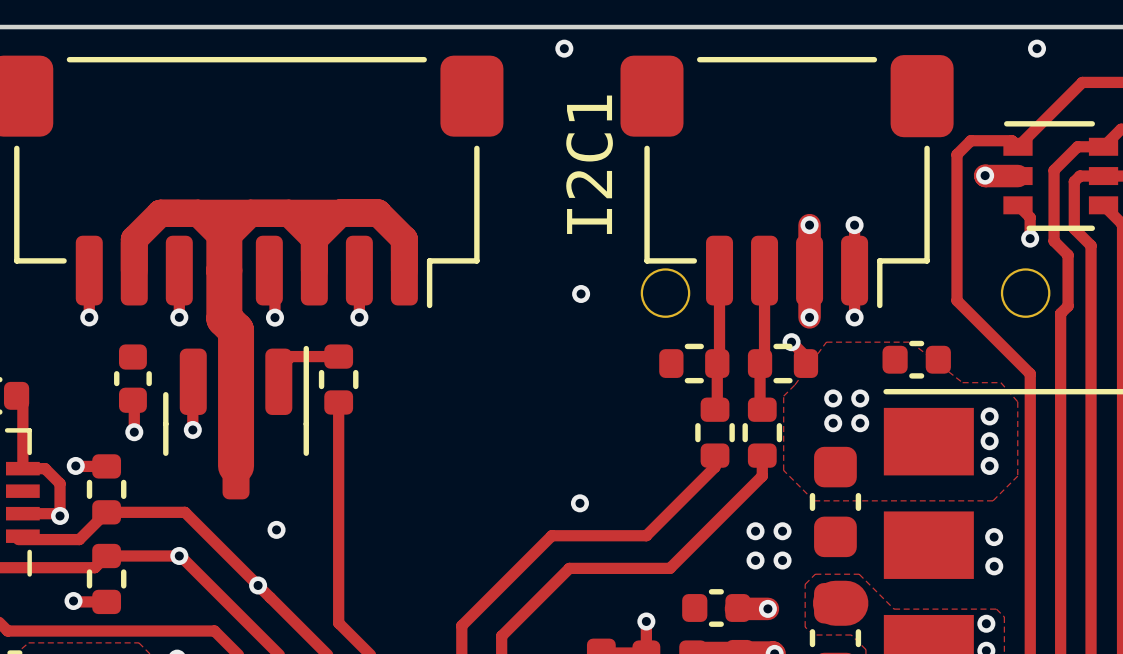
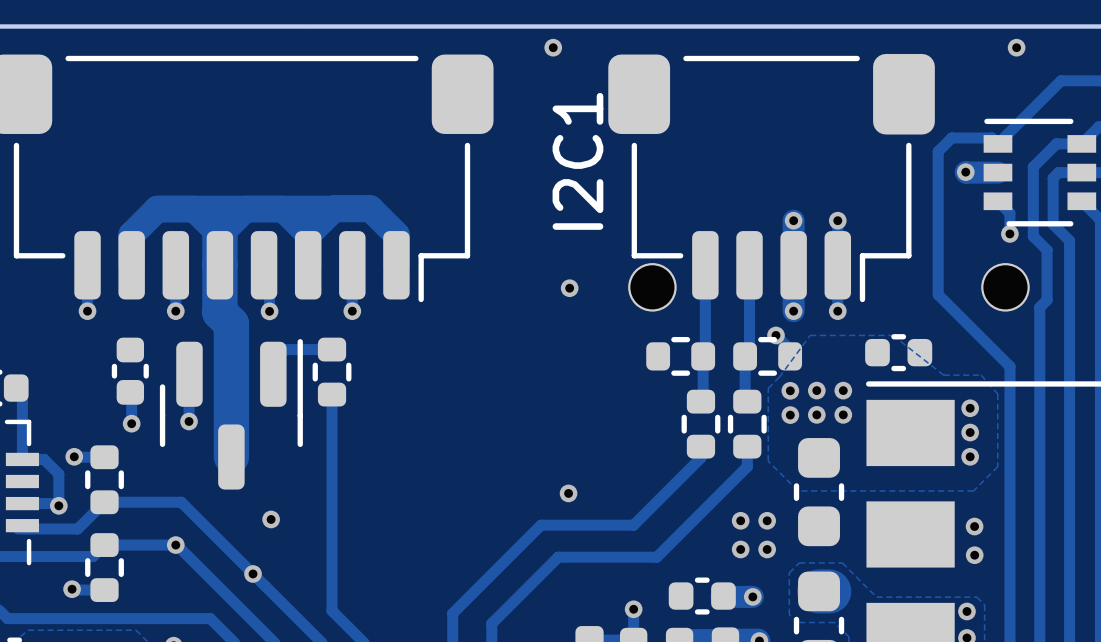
via: none -> (790, 390)
via: none -> (790, 415)

